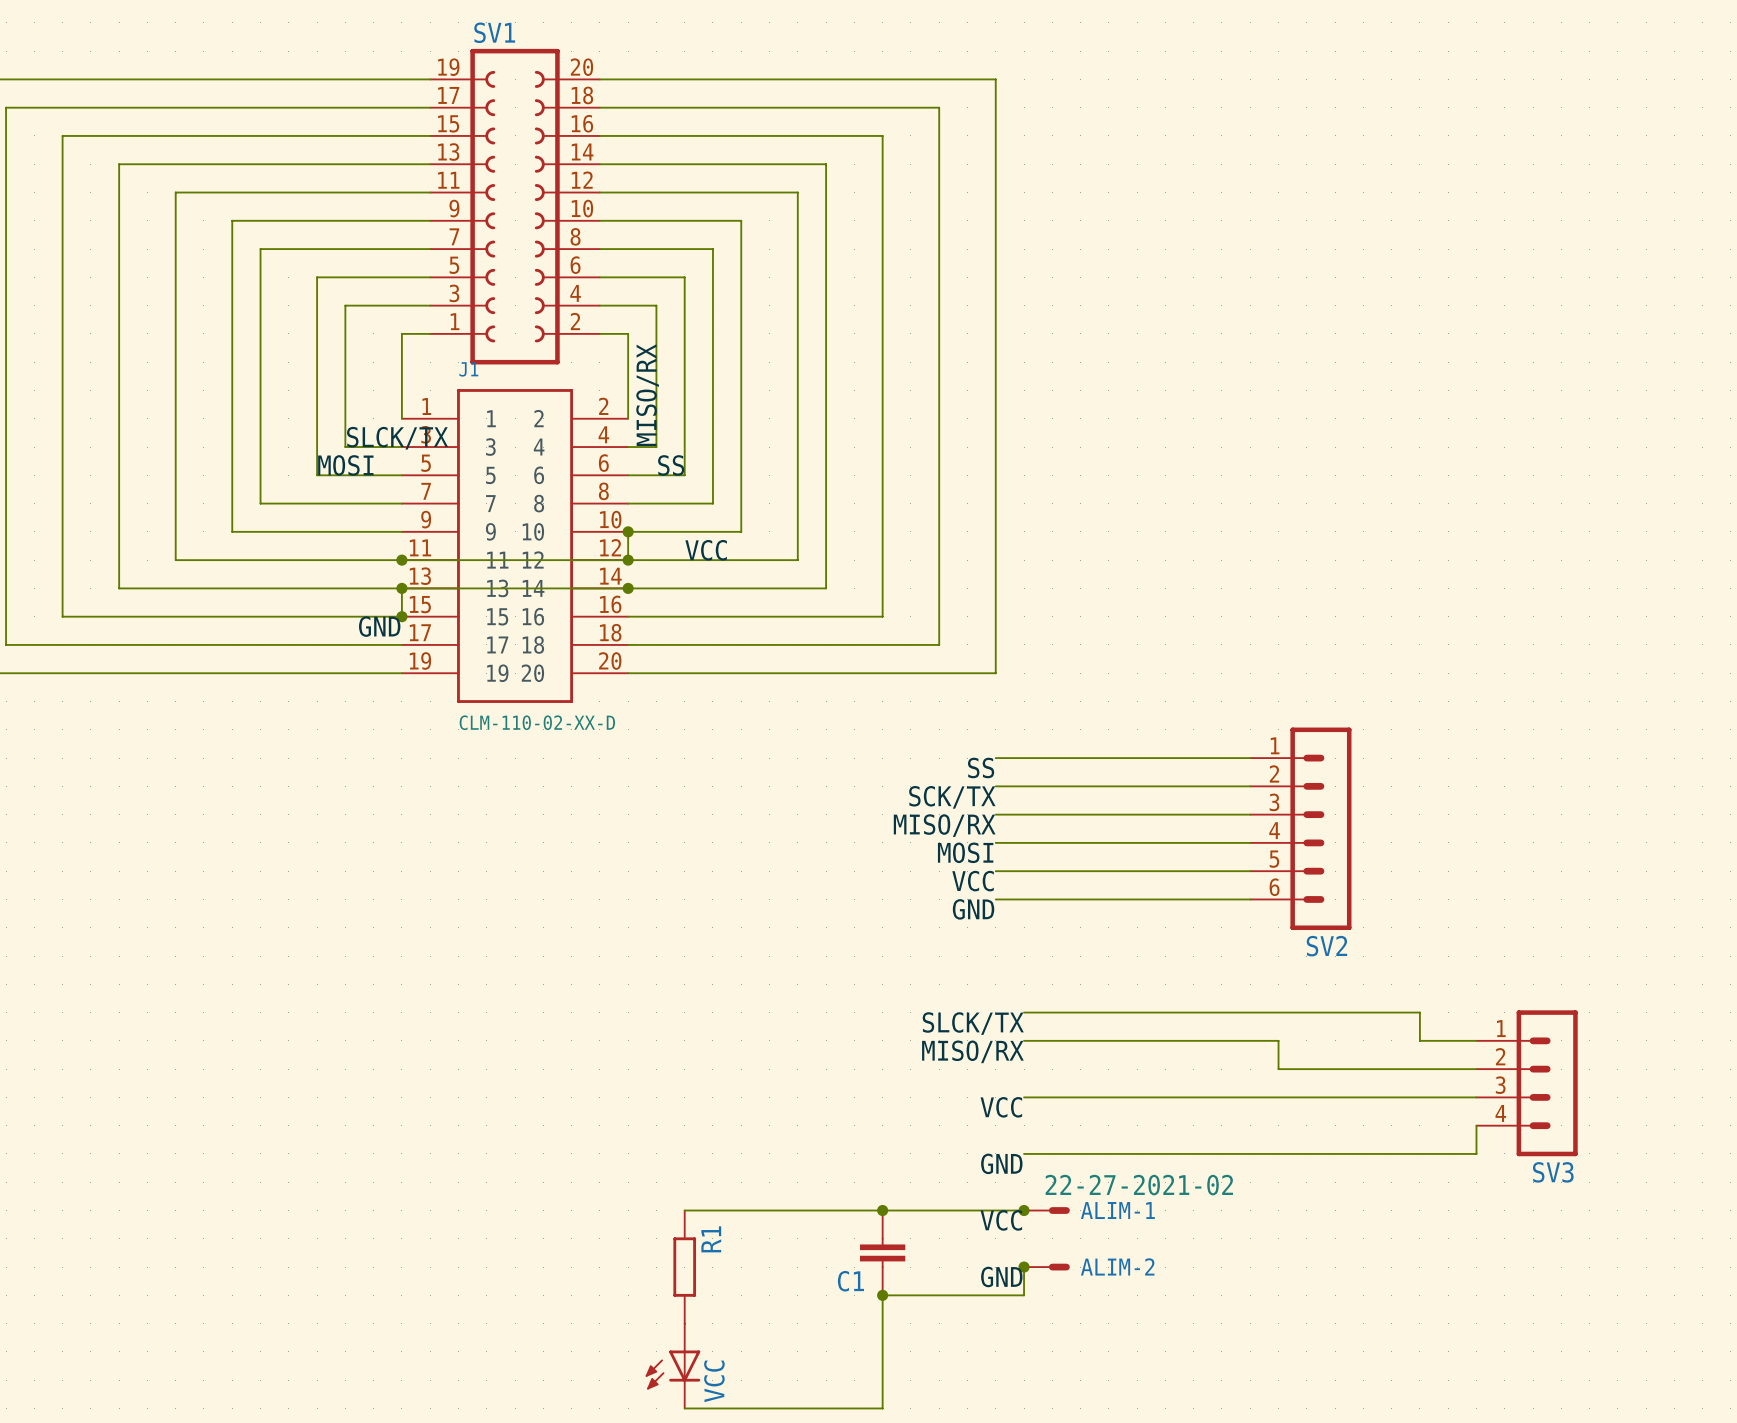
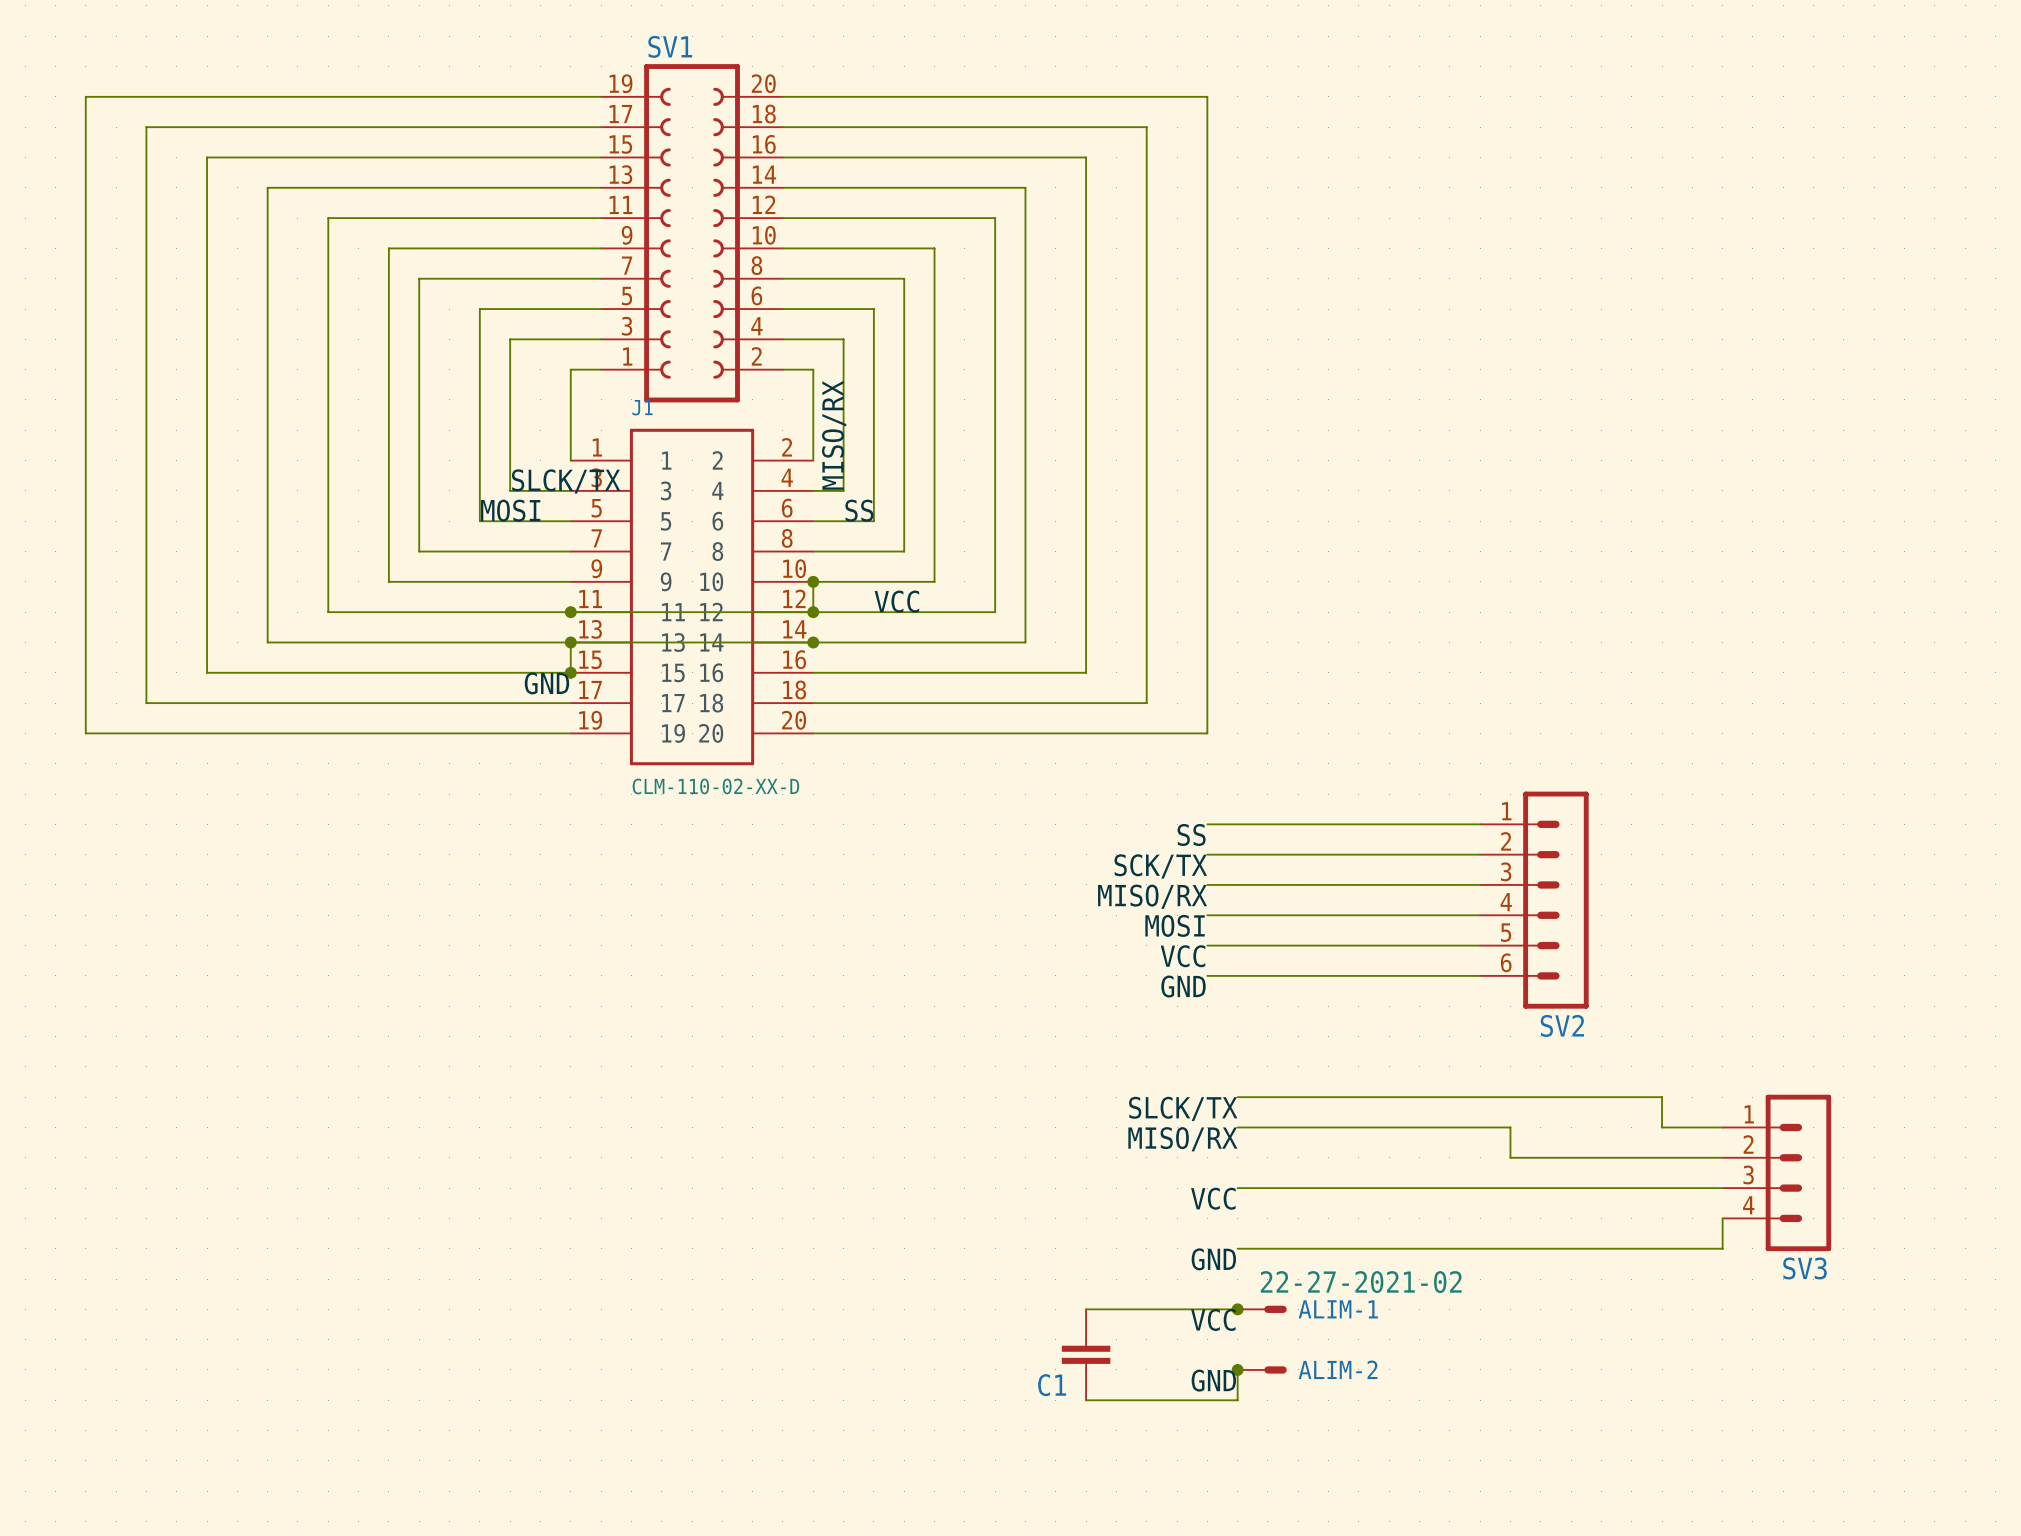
wire: (684, 1210) (882, 1210) -> none
junction: (882, 1210) -> none
R1: (684, 1267) -> none
wire: (882, 1295) (882, 1408) (684, 1408) -> none
junction: (882, 1295) -> none
VCC: (672, 1366) -> none

